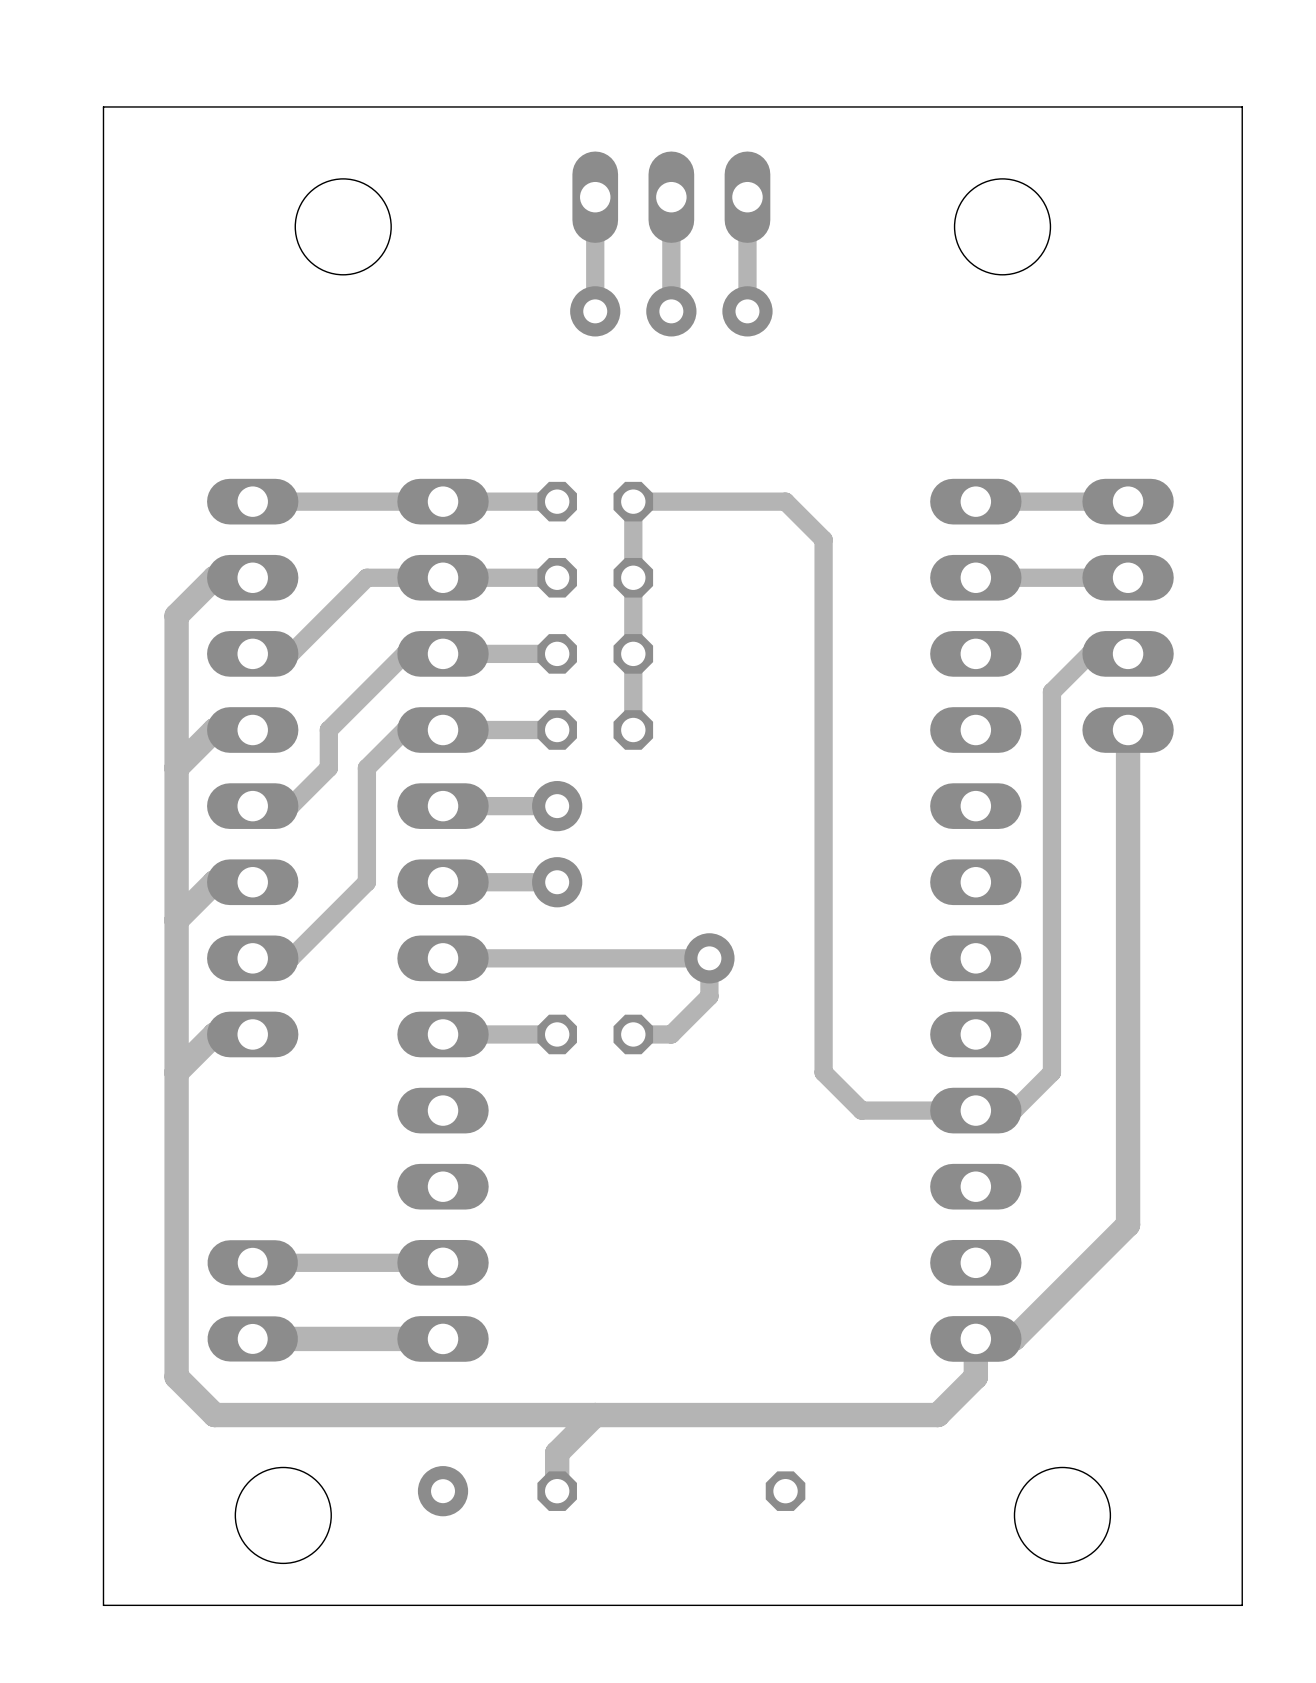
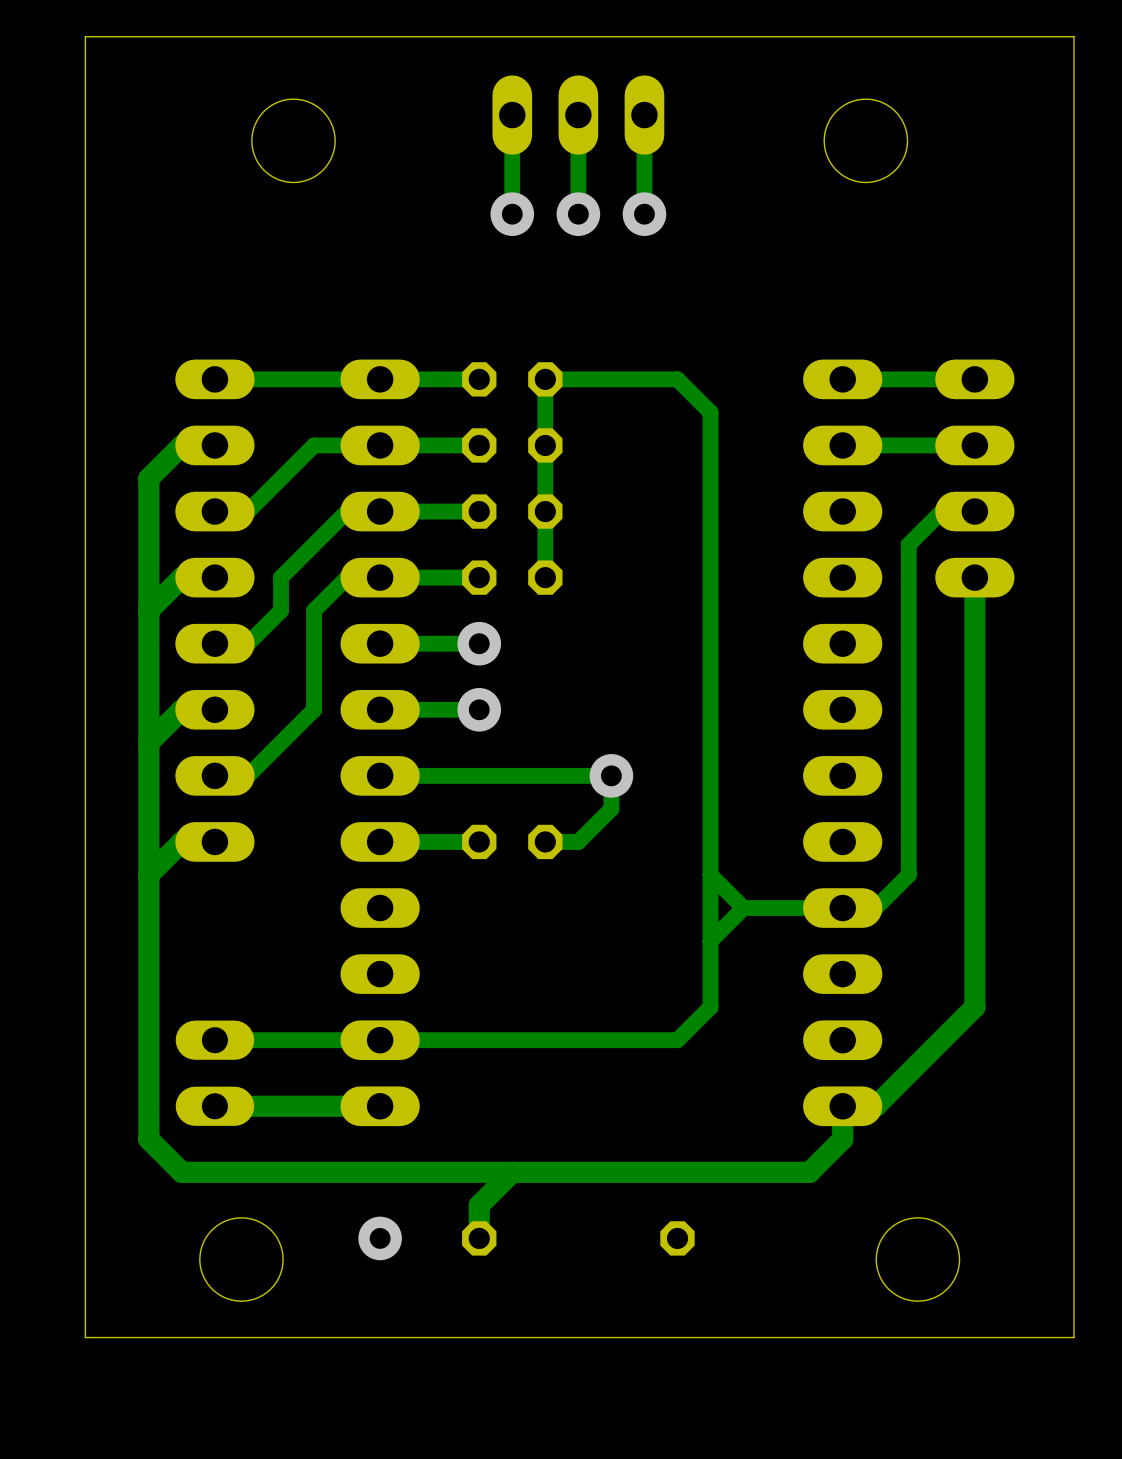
track: none -> (710, 874) (710, 1007) (677, 1040) (380, 1040)
track: none -> (743, 908) (710, 941)

